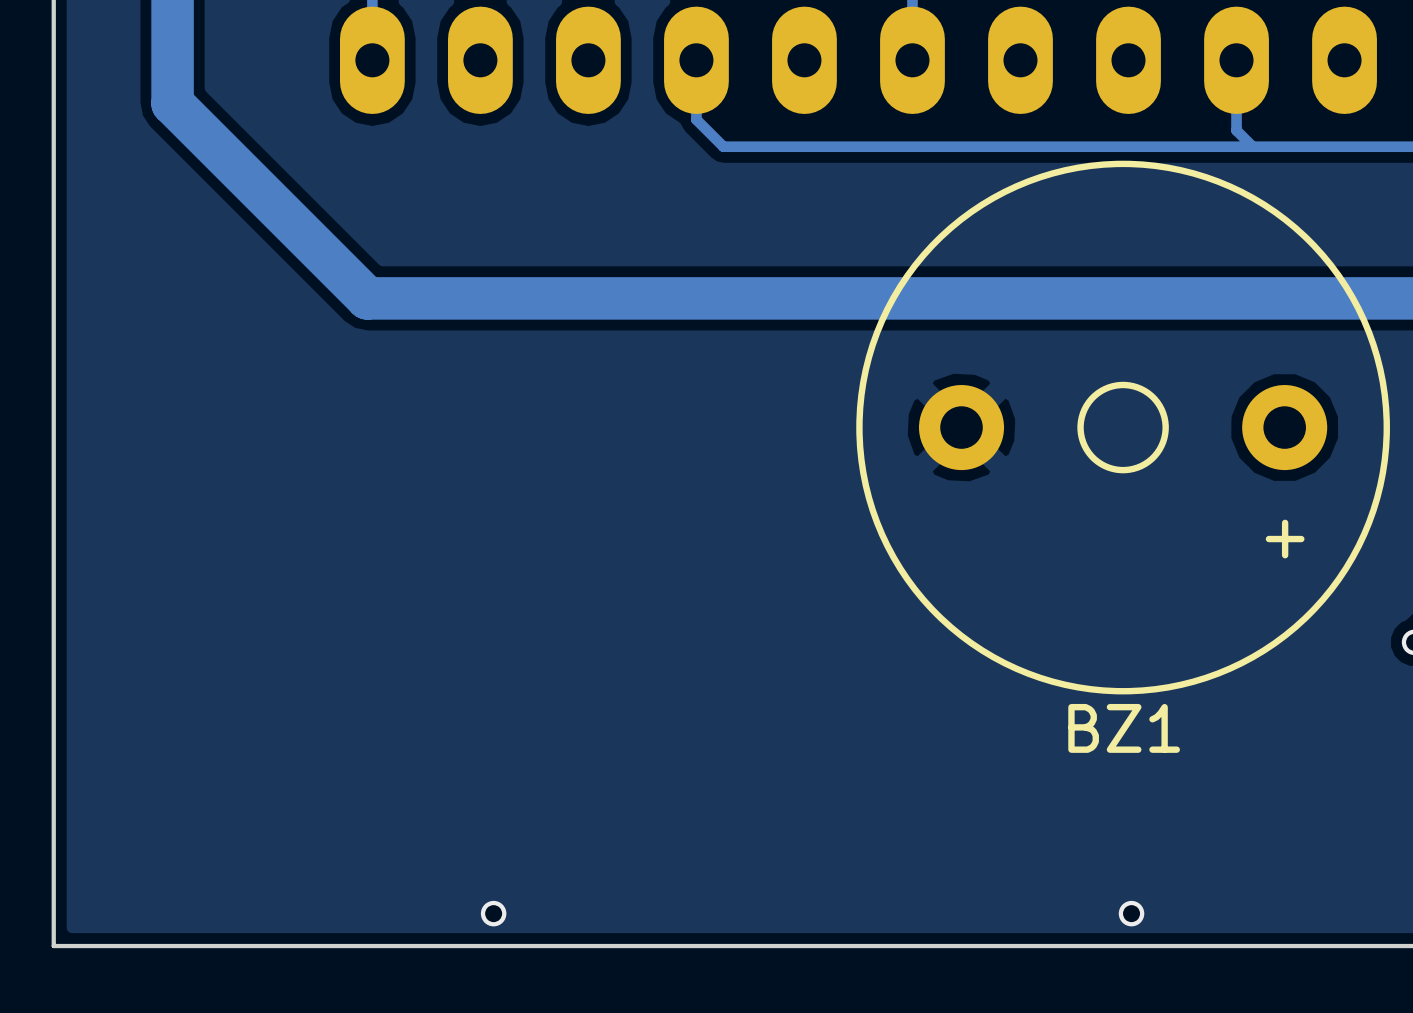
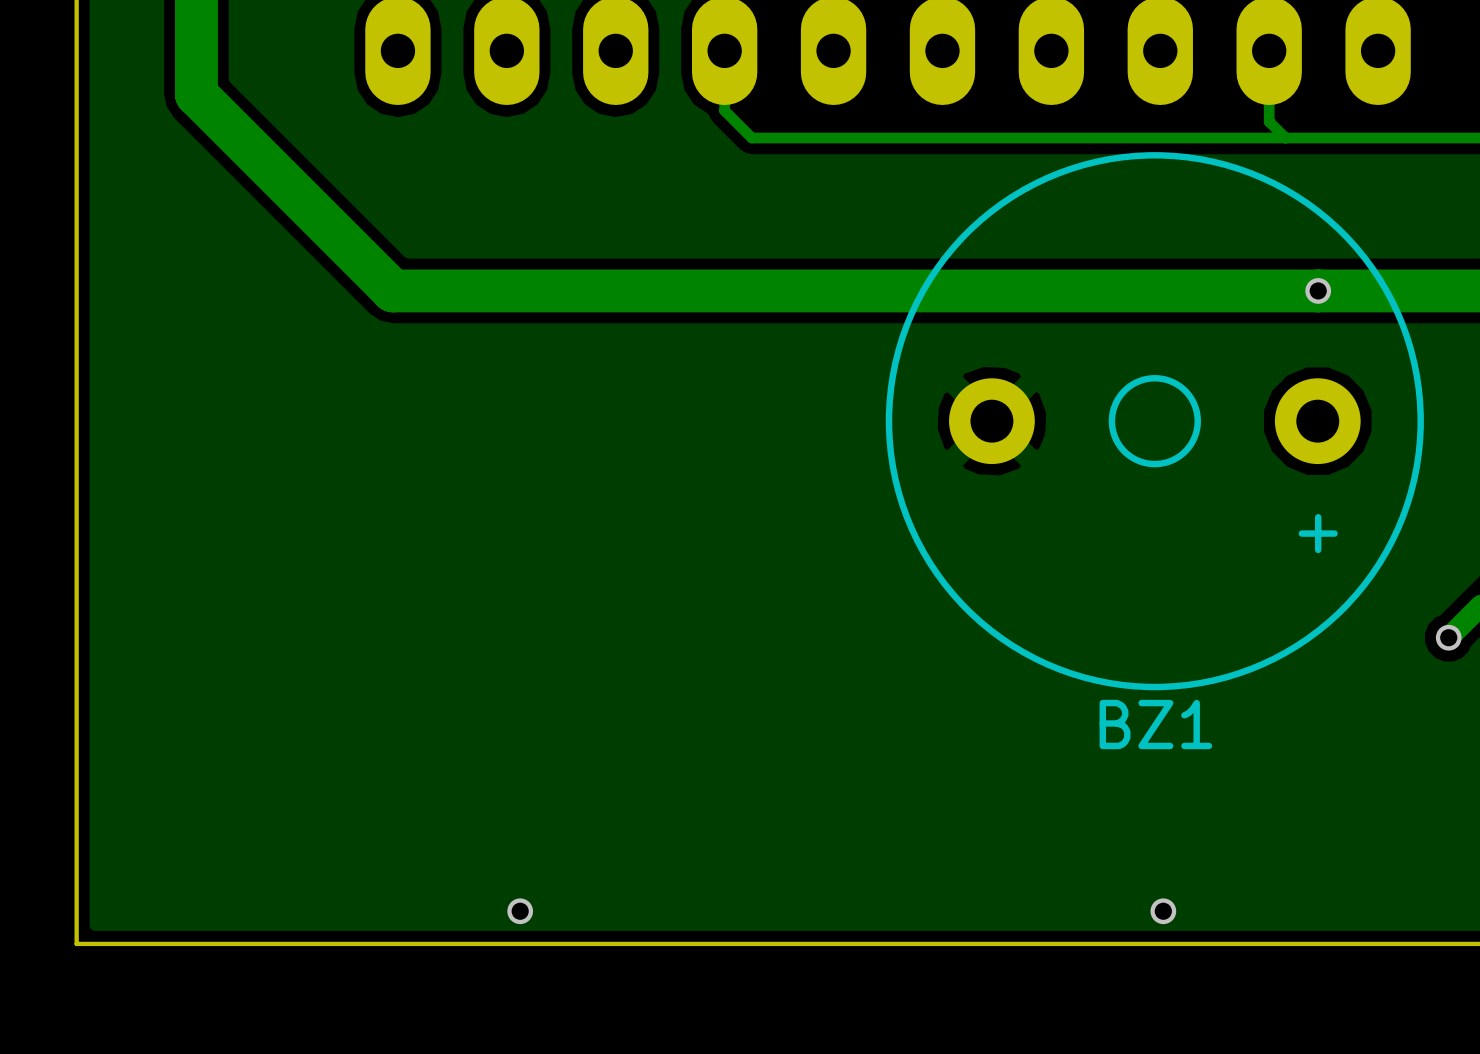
via: none -> (1318, 290)

